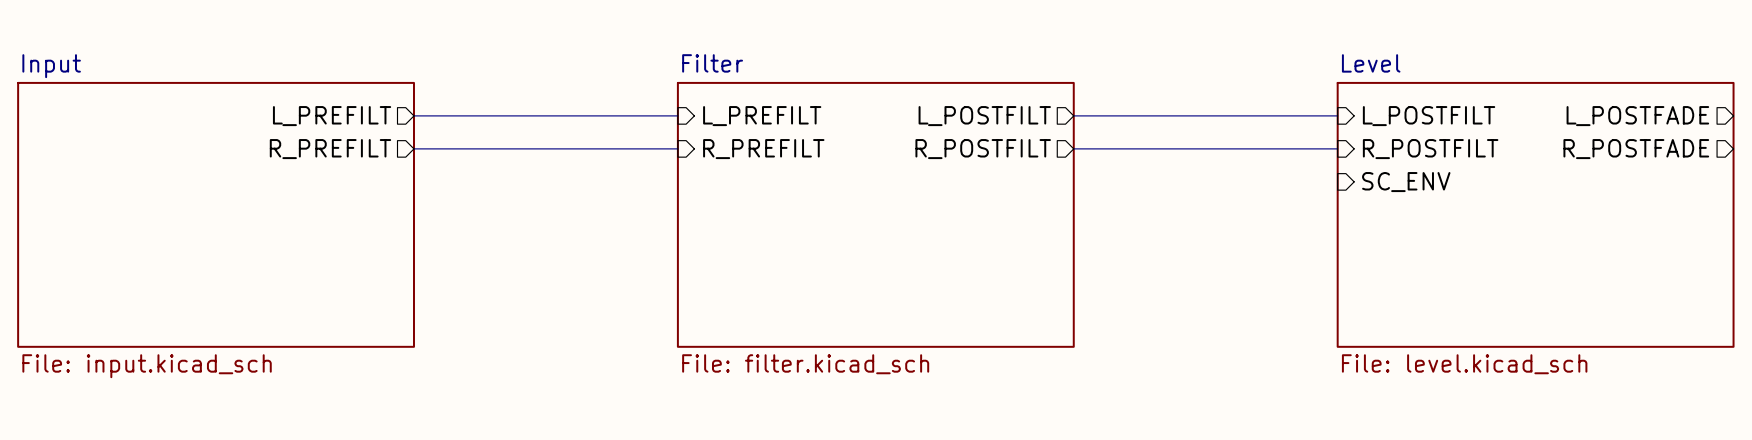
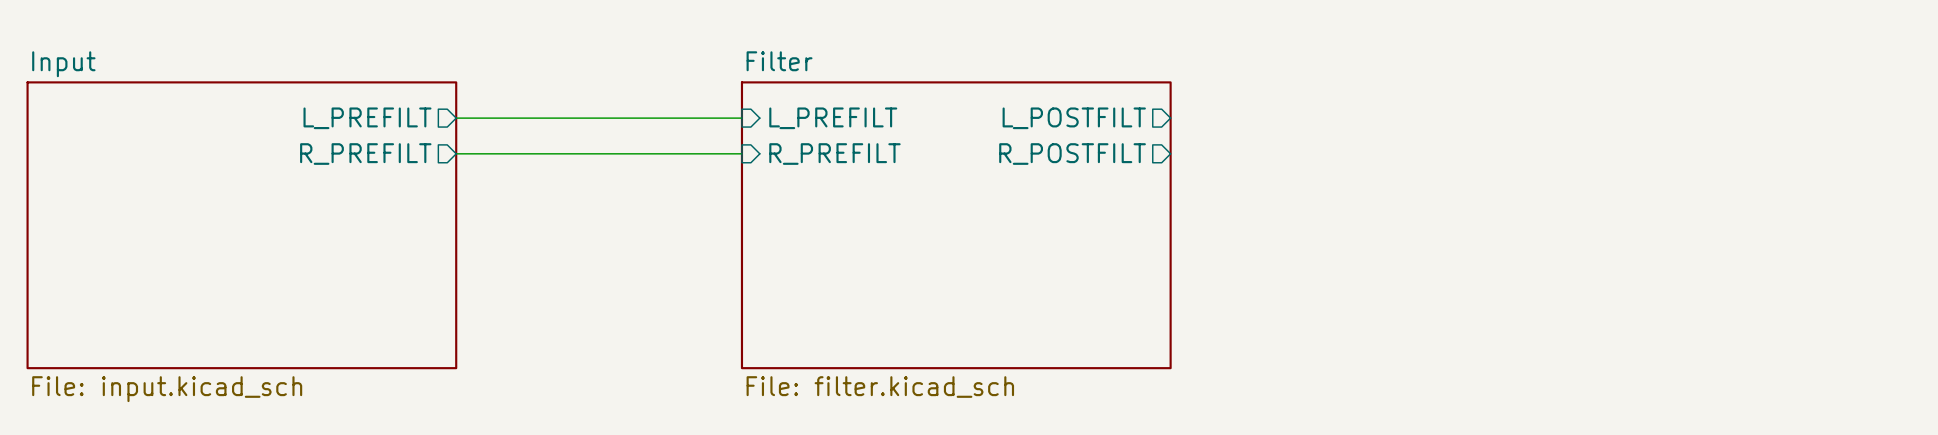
wire: (1073, 115) (1337, 115) -> none
sheet pin: L_POSTFILT (1429, 116) -> none
sheet pin: L_POSTFADE (1637, 116) -> none
wire: (1073, 148) (1337, 148) -> none
sheet pin: R_POSTFILT (1430, 149) -> none
sheet pin: R_POSTFADE (1636, 149) -> none
sheet pin: SC_ENV (1406, 182) -> none
sheet Level: File: level.kicad_sch (1535, 214) -> none

